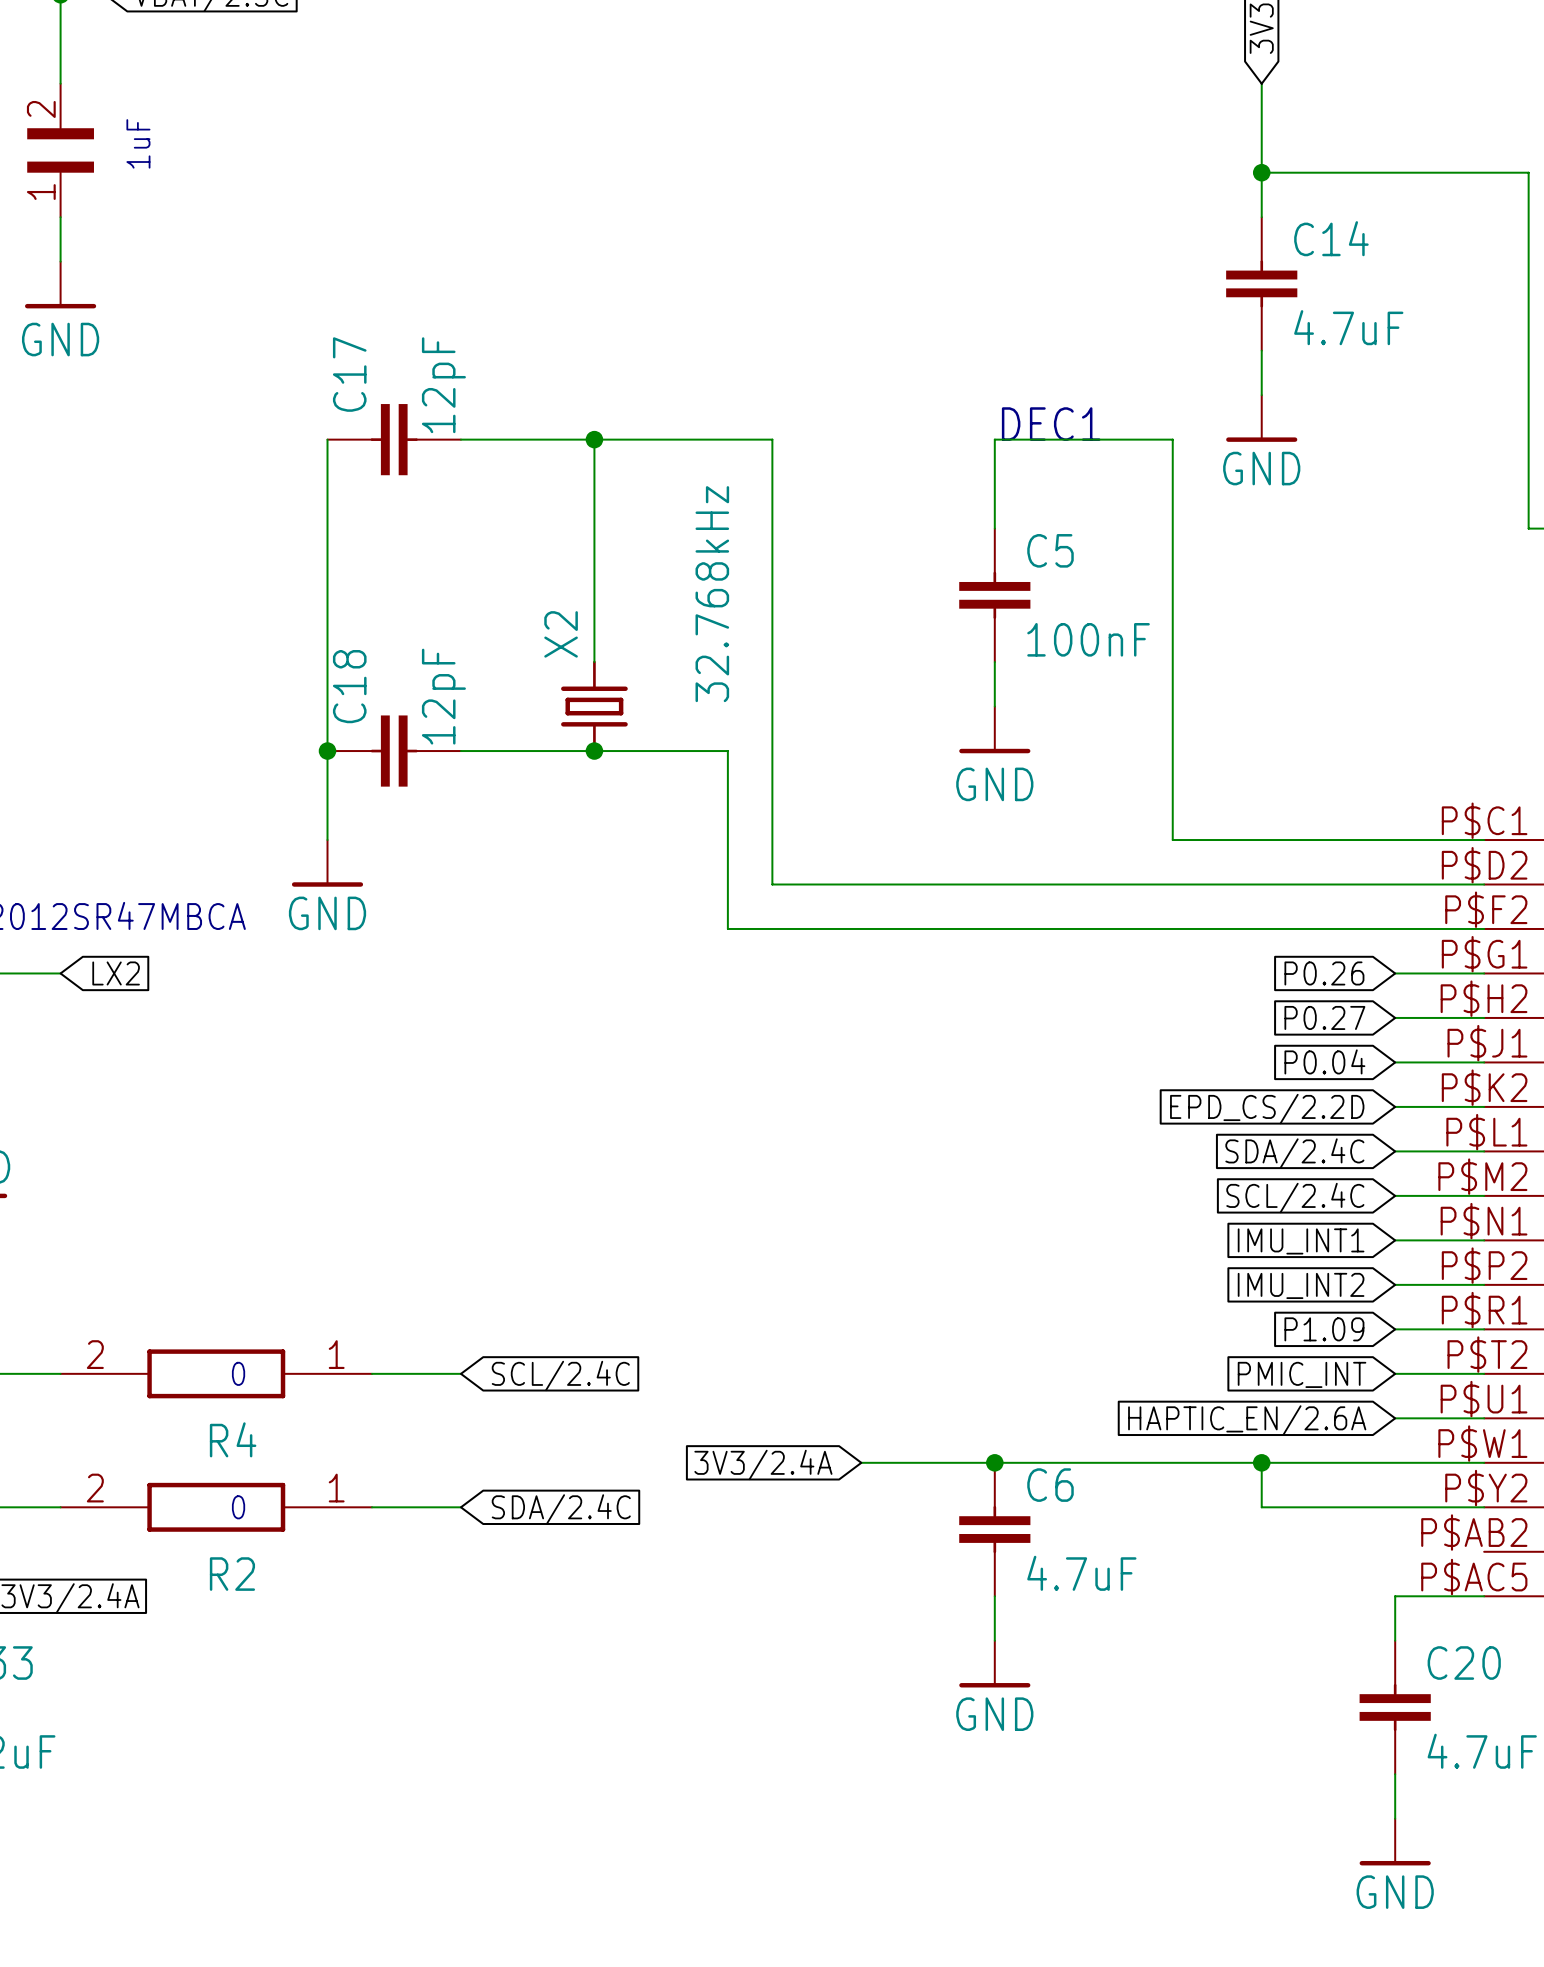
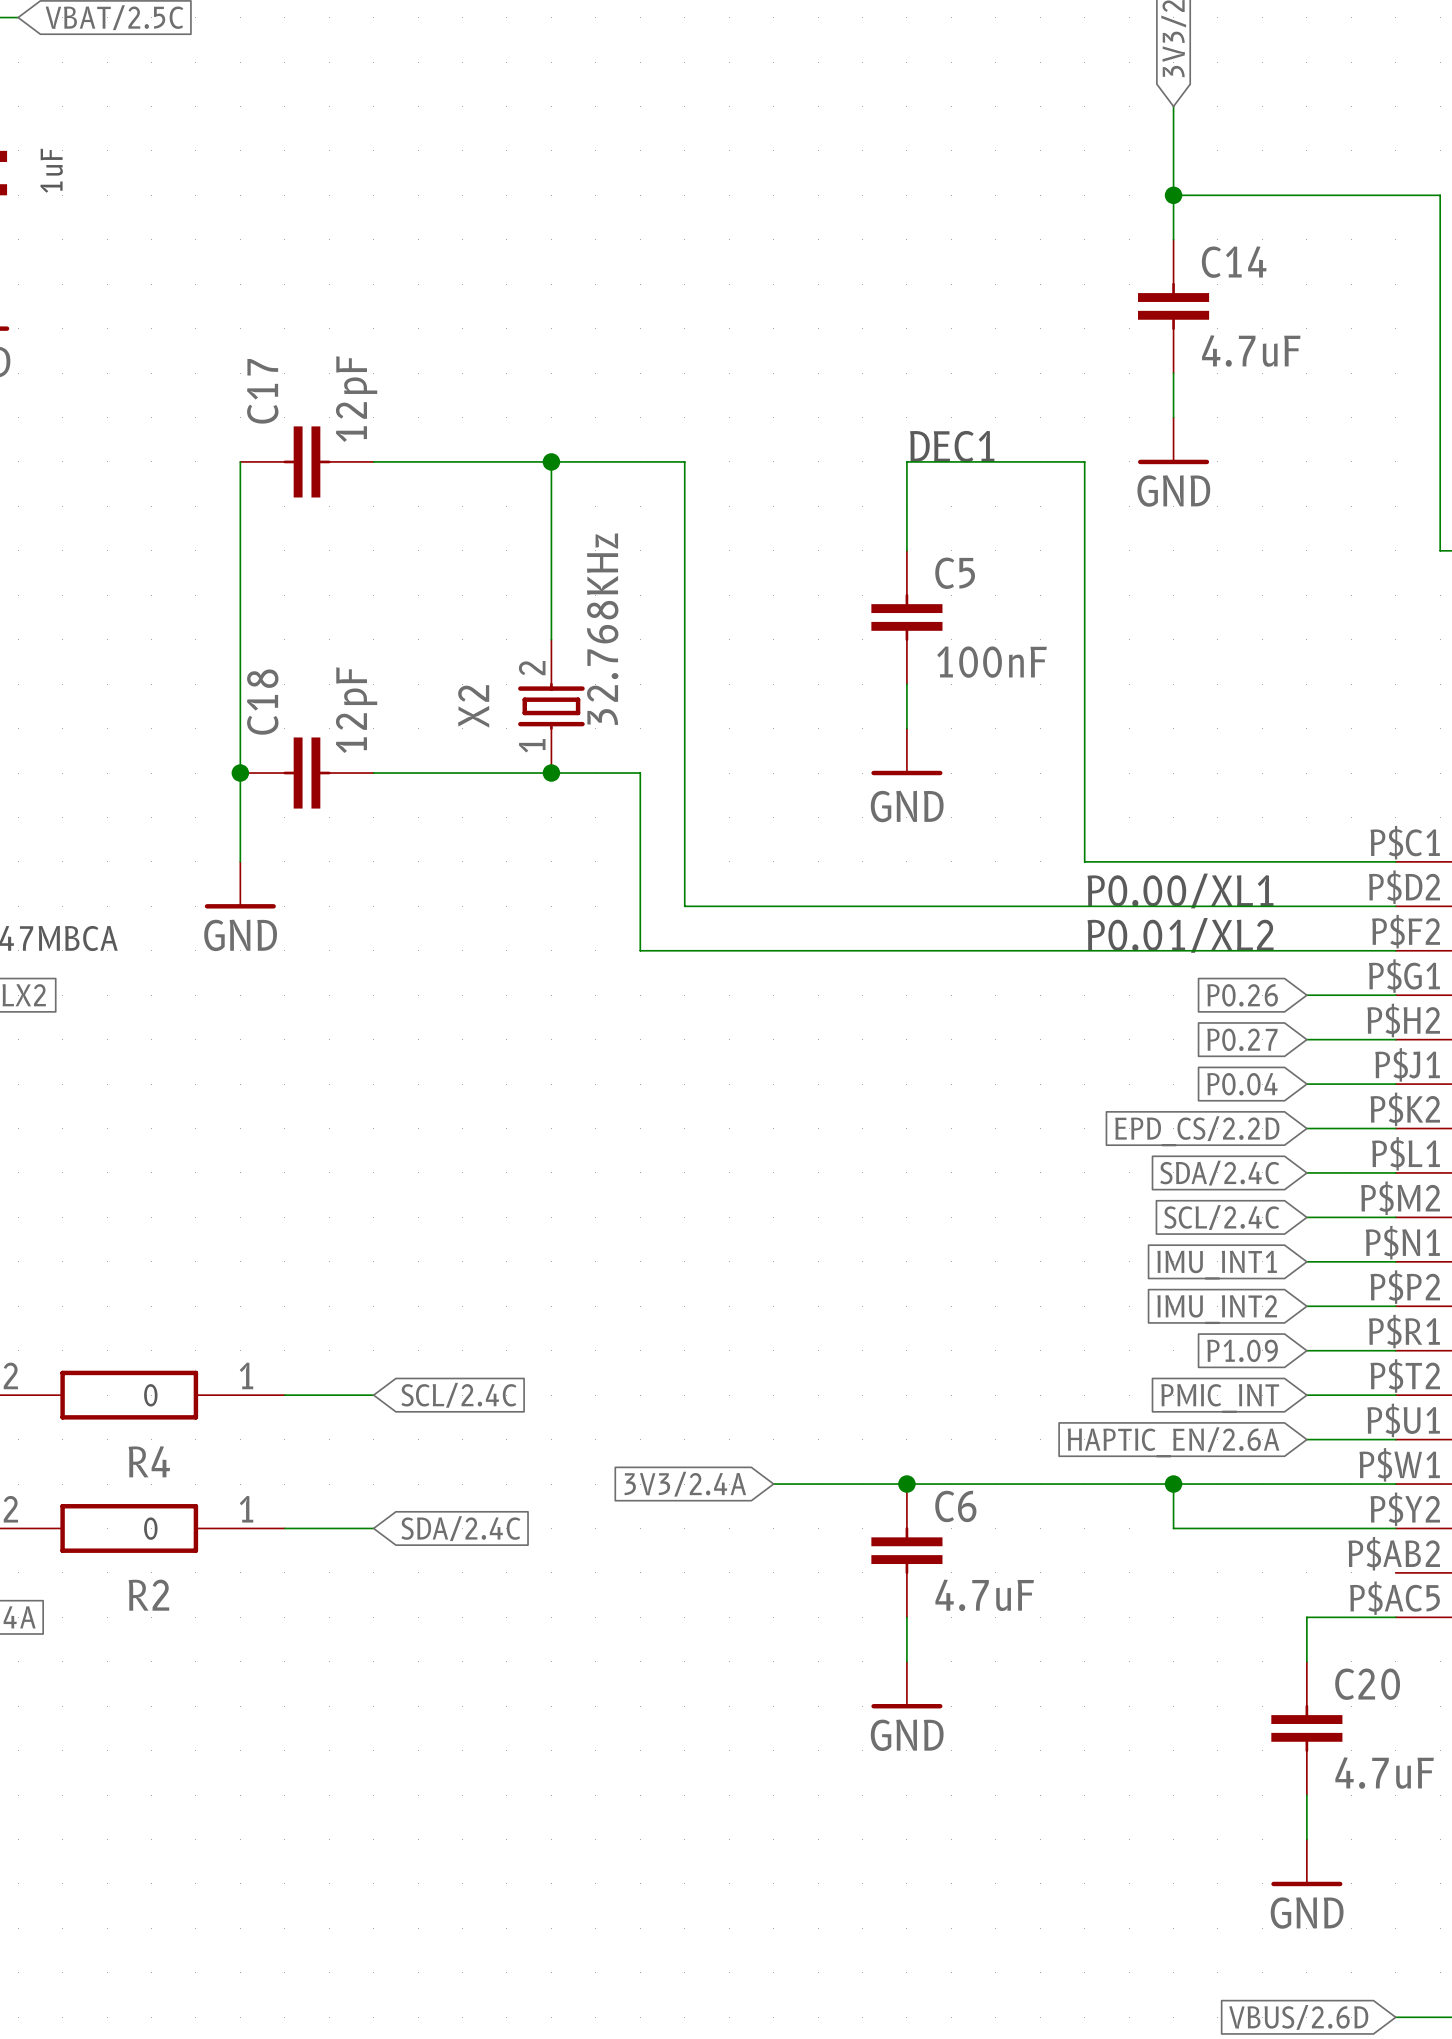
wire: (594, 439) (594, 662) -> none
junction position: (594, 439) -> (551, 461)
wire: none -> (551, 461) (551, 639)
X2 value: 32.768kHz (712, 594) -> 32.768KHz (602, 629)
X2 name position: X2 (561, 634) -> X2 (473, 706)
X2 symbol: [561, 660, 628, 753] -> [518, 639, 585, 774]
junction position: (594, 751) -> (551, 773)
text: none -> P0.00/XL1 (1180, 890)
text: none -> P0.01/XL2 (1180, 935)

